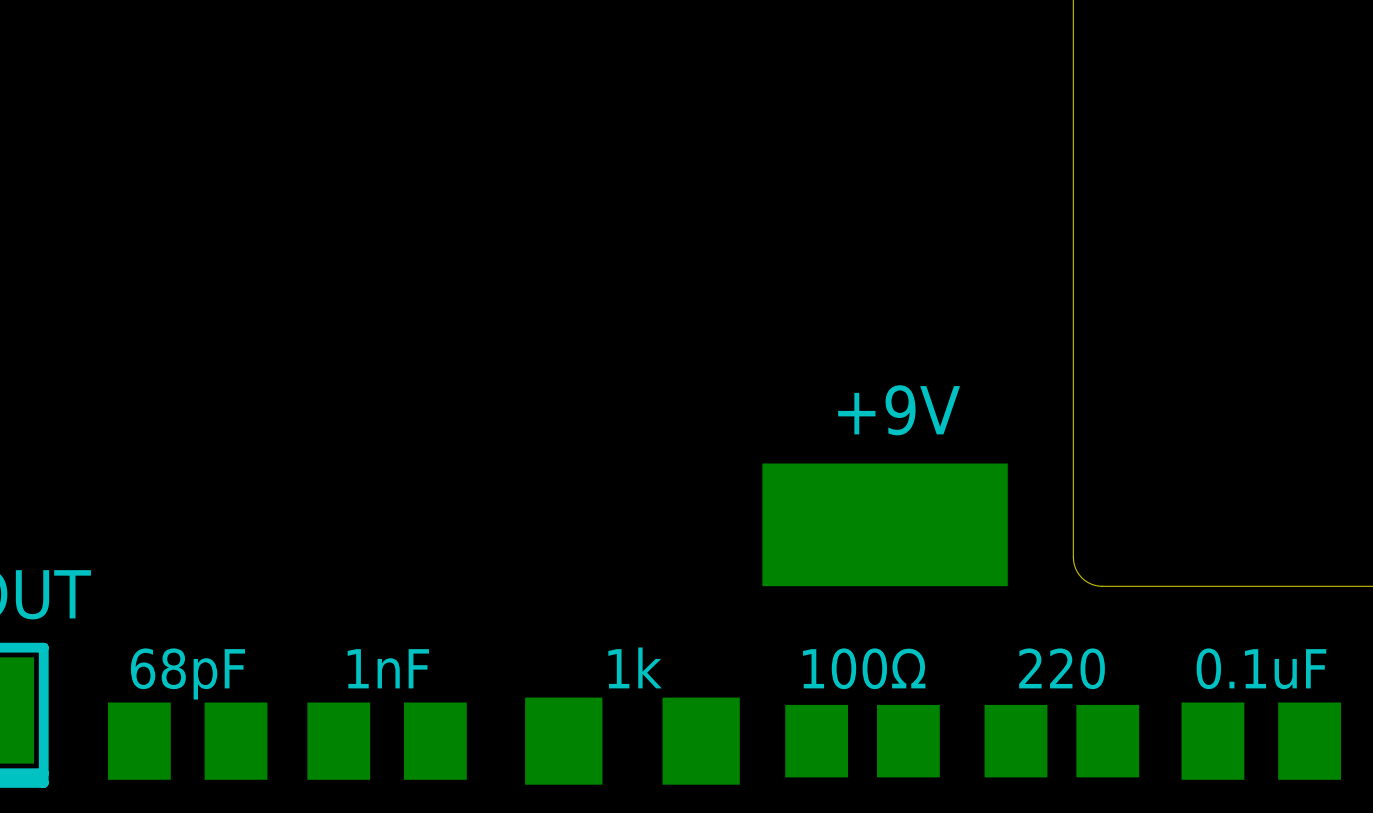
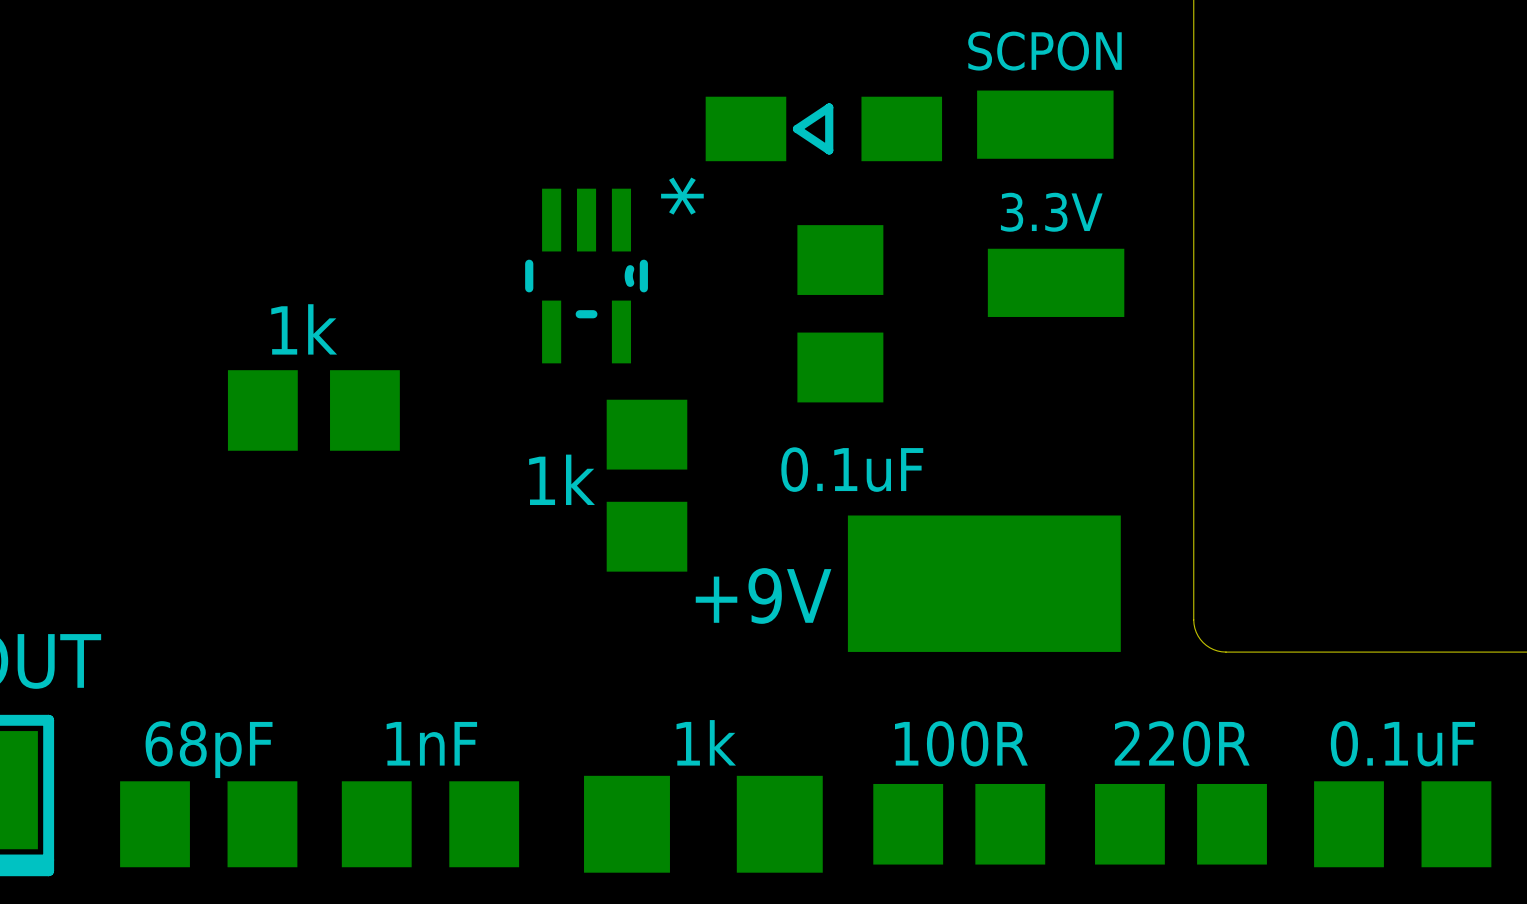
text: none -> SCPON (1044, 51)
part: none -> (1045, 124)
part: none -> (823, 128)
text: none -> 3.3V (1051, 212)
part: none -> (586, 276)
part: none -> (1056, 282)
part: none -> 0.1uF (840, 313)
part: none -> 1k (313, 410)
text position: +9V (899, 410) -> +9V (763, 595)
part: none -> 1k (646, 485)
text: 100Ω (864, 668) -> 100R (961, 743)
text: 220 (1062, 668) -> 220R (1182, 743)

